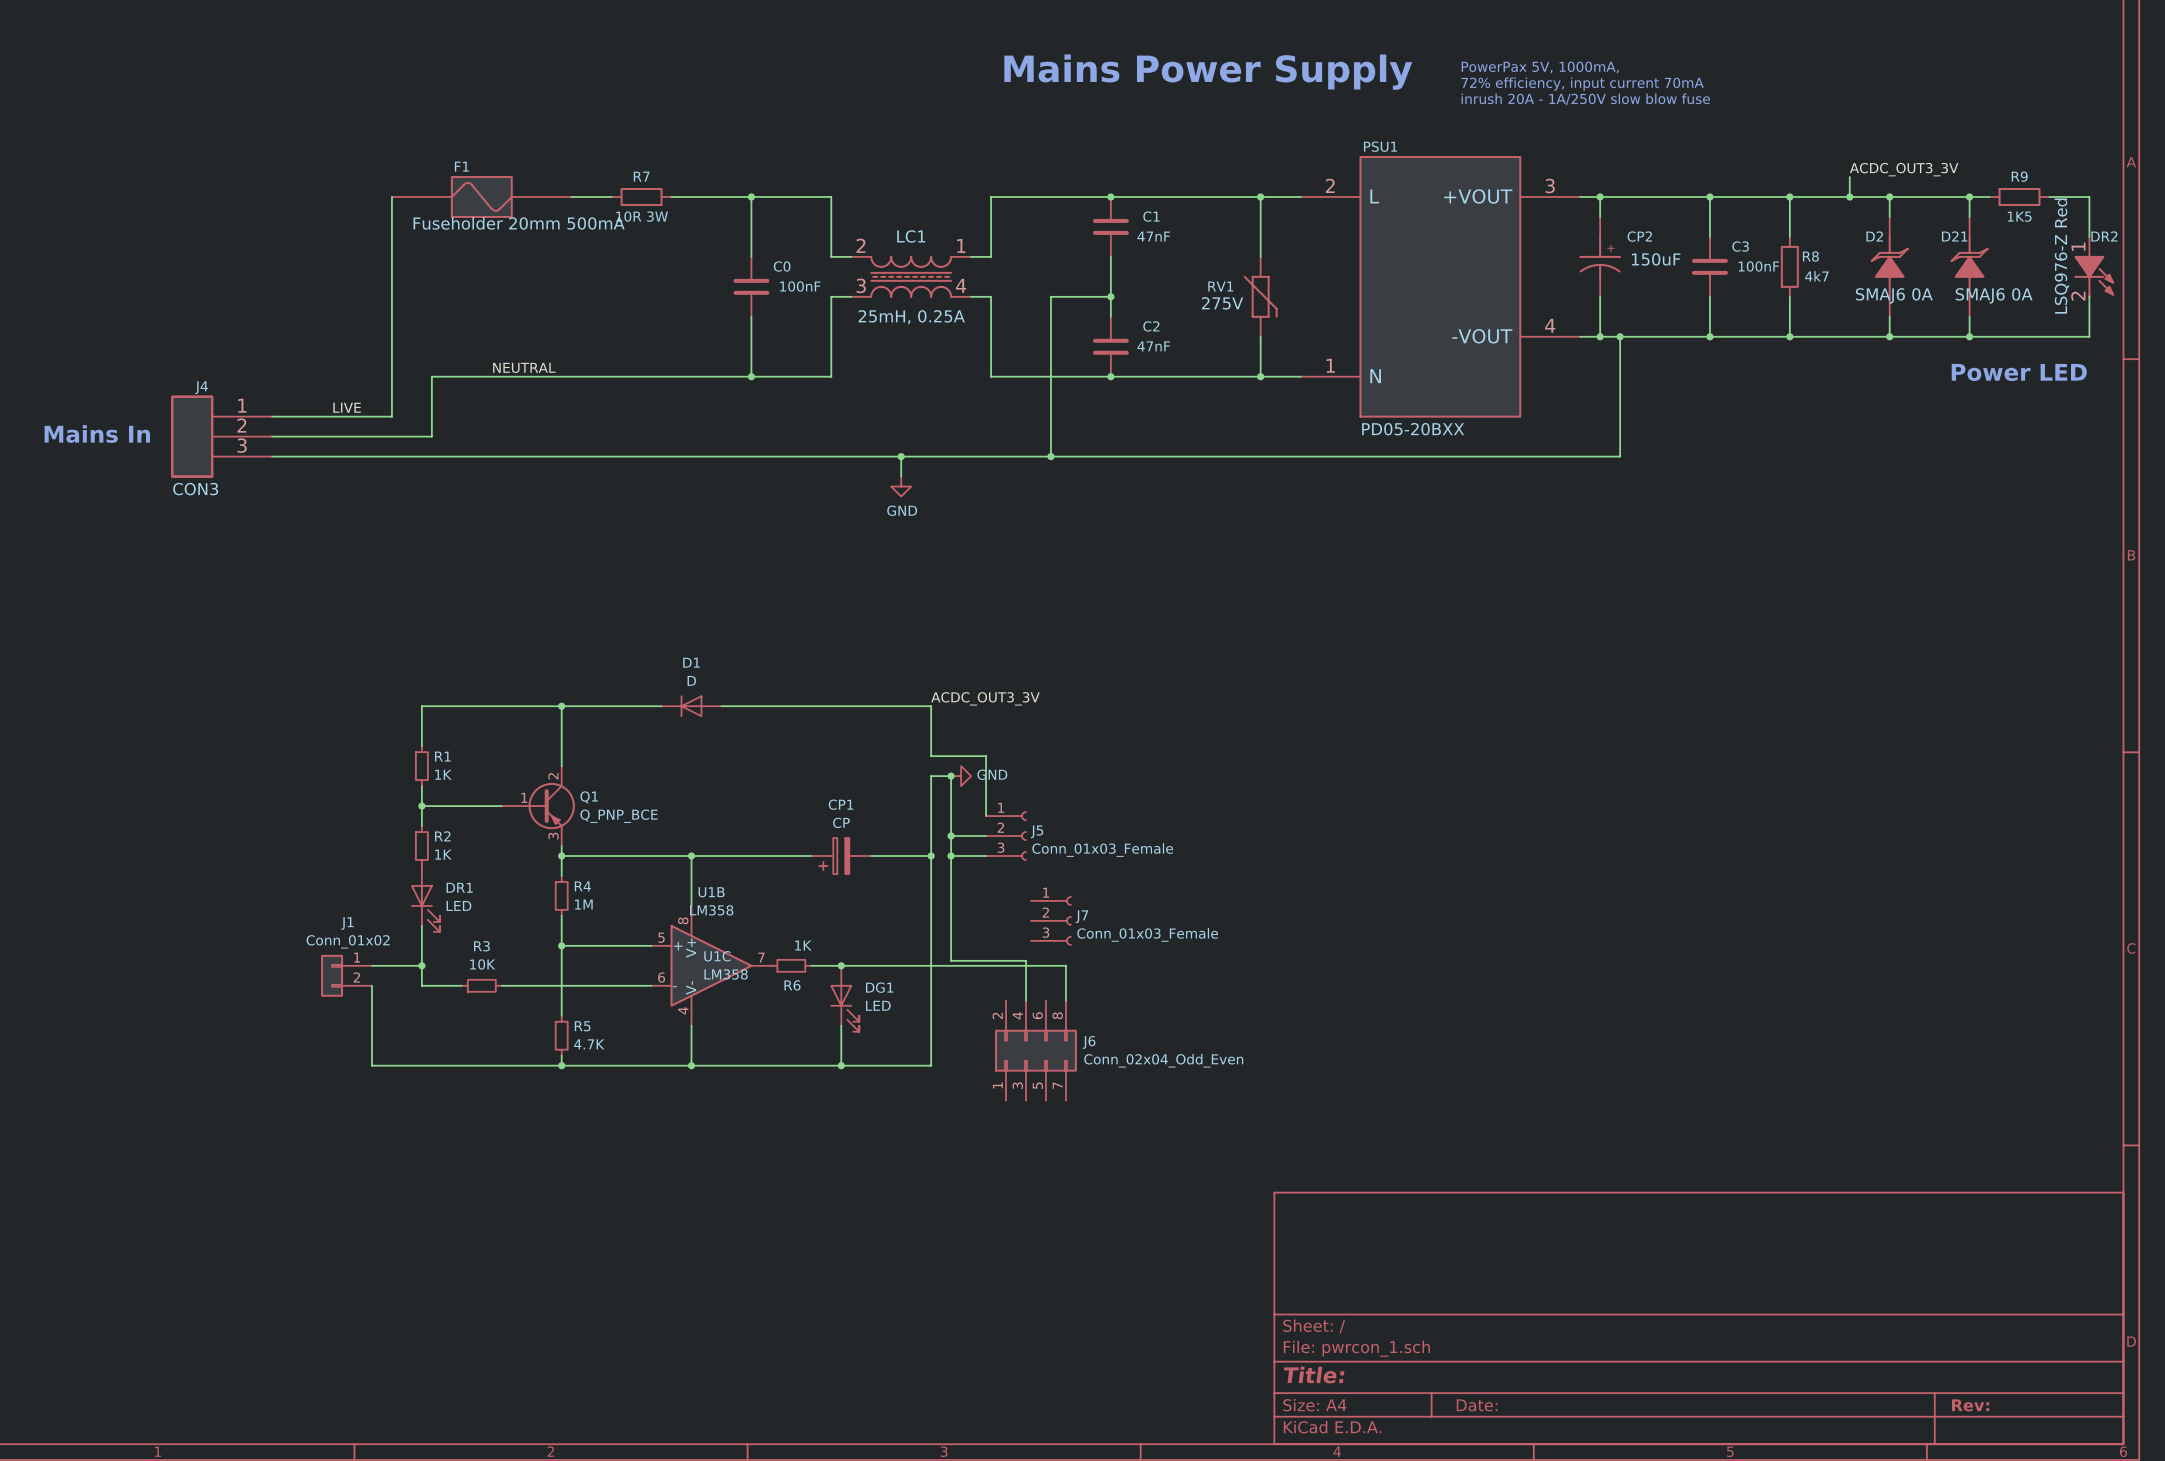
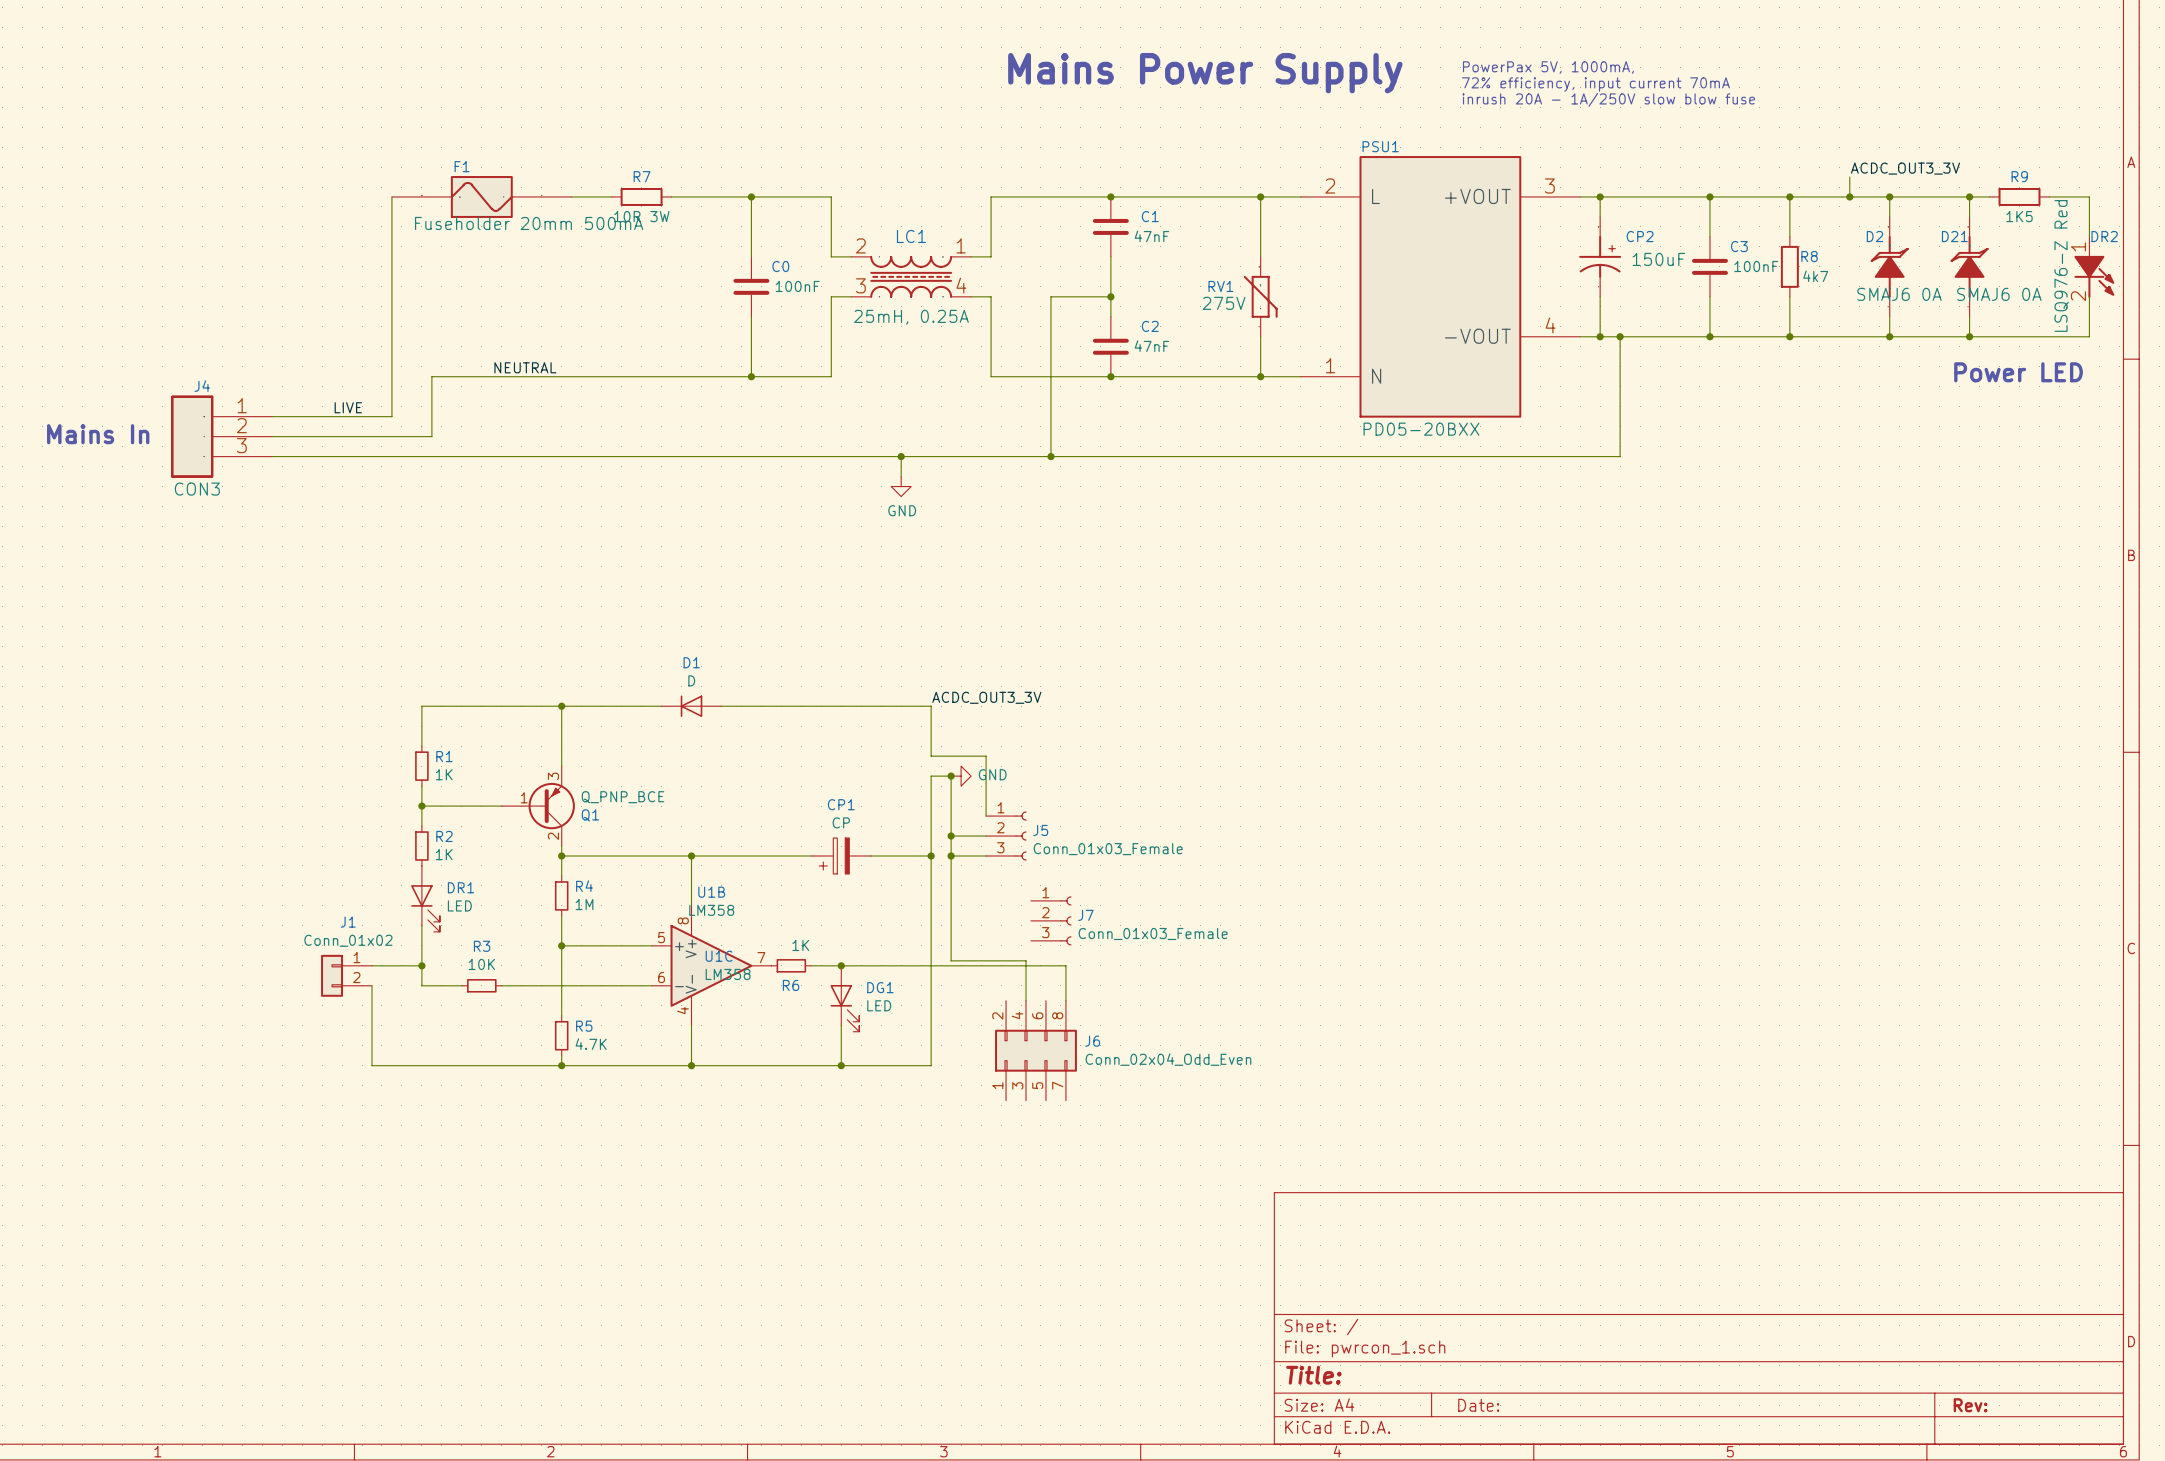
Q1 flip: as is (551, 806) -> up-down (551, 806)

